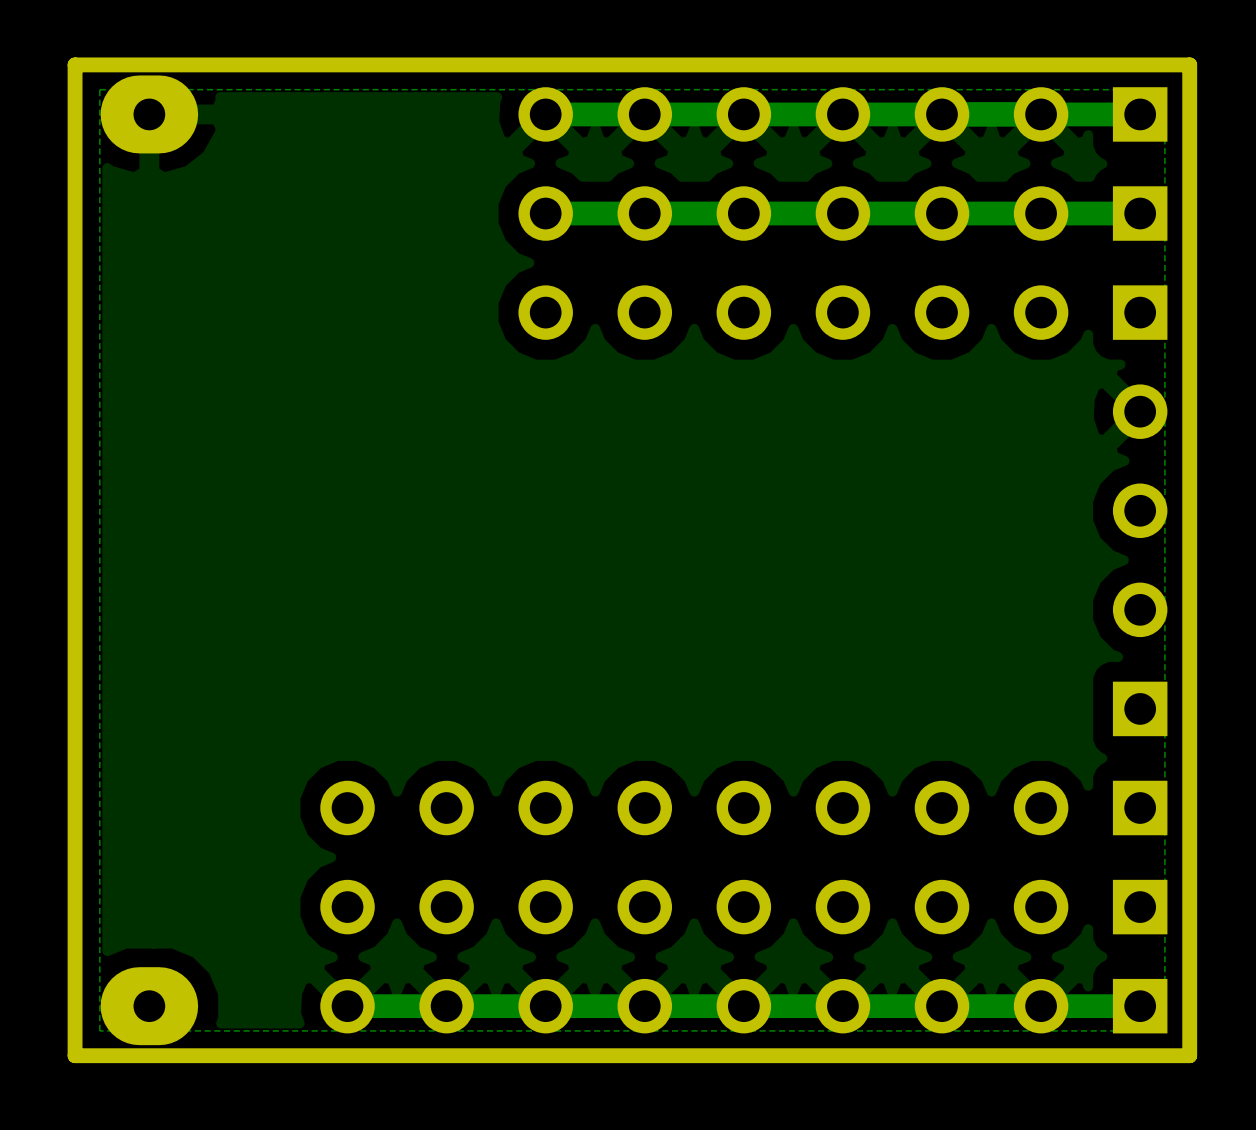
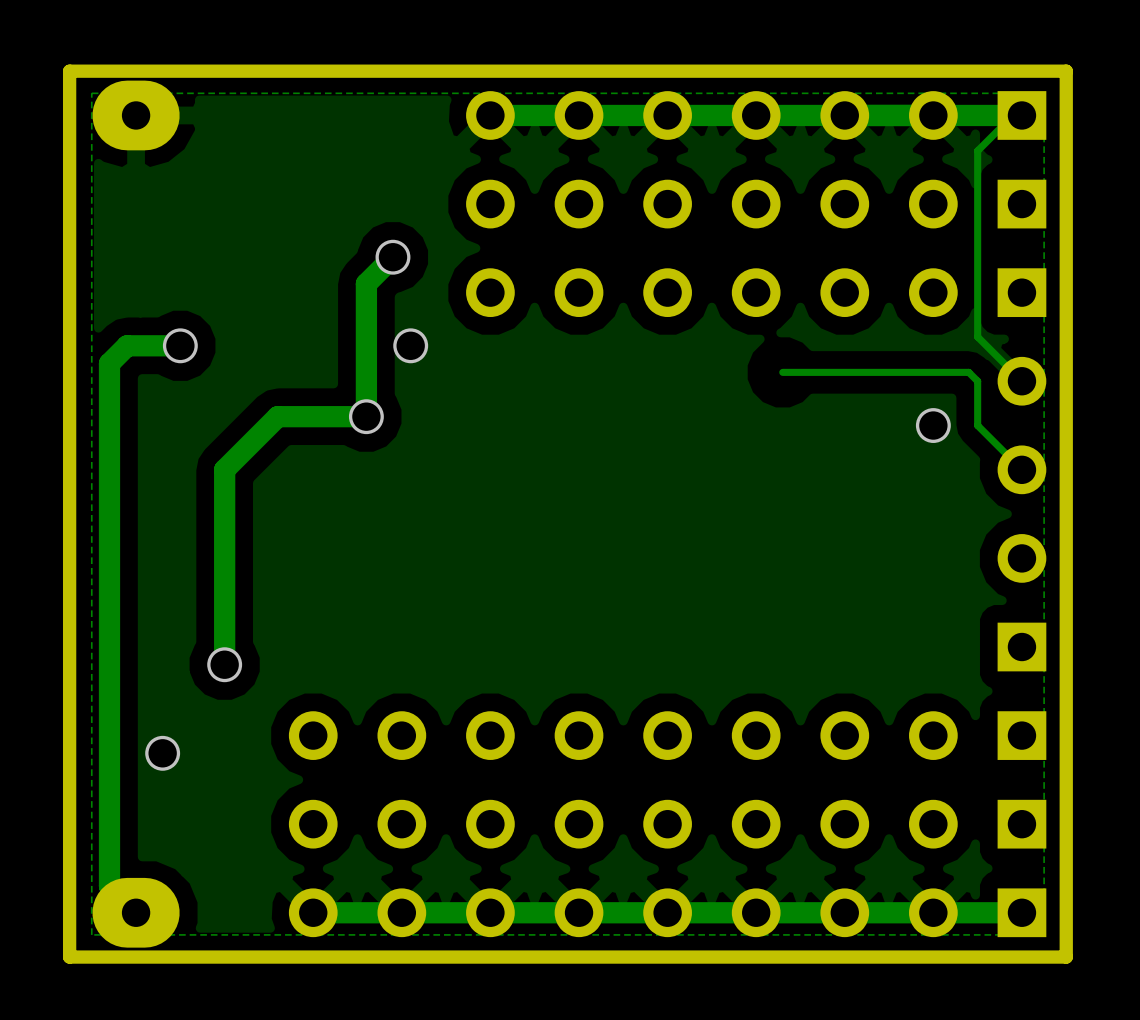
track: none -> (1021, 115) (1013, 115) (977, 150) (977, 336) (1021, 381)
track: (1140, 213) (545, 213) -> none
track: none -> (392, 257) (366, 283) (366, 416) (277, 416) (224, 469) (224, 664)
via: none -> (392, 257)
track: none -> (180, 345) (127, 345) (109, 363) (109, 886) (136, 912)
via: none -> (180, 345)
via: none -> (410, 345)
track: none -> (782, 372) (968, 372) (977, 381) (977, 425) (1021, 469)
via: none -> (366, 416)
via: none -> (933, 425)
via: none -> (224, 664)
via: none -> (162, 753)

